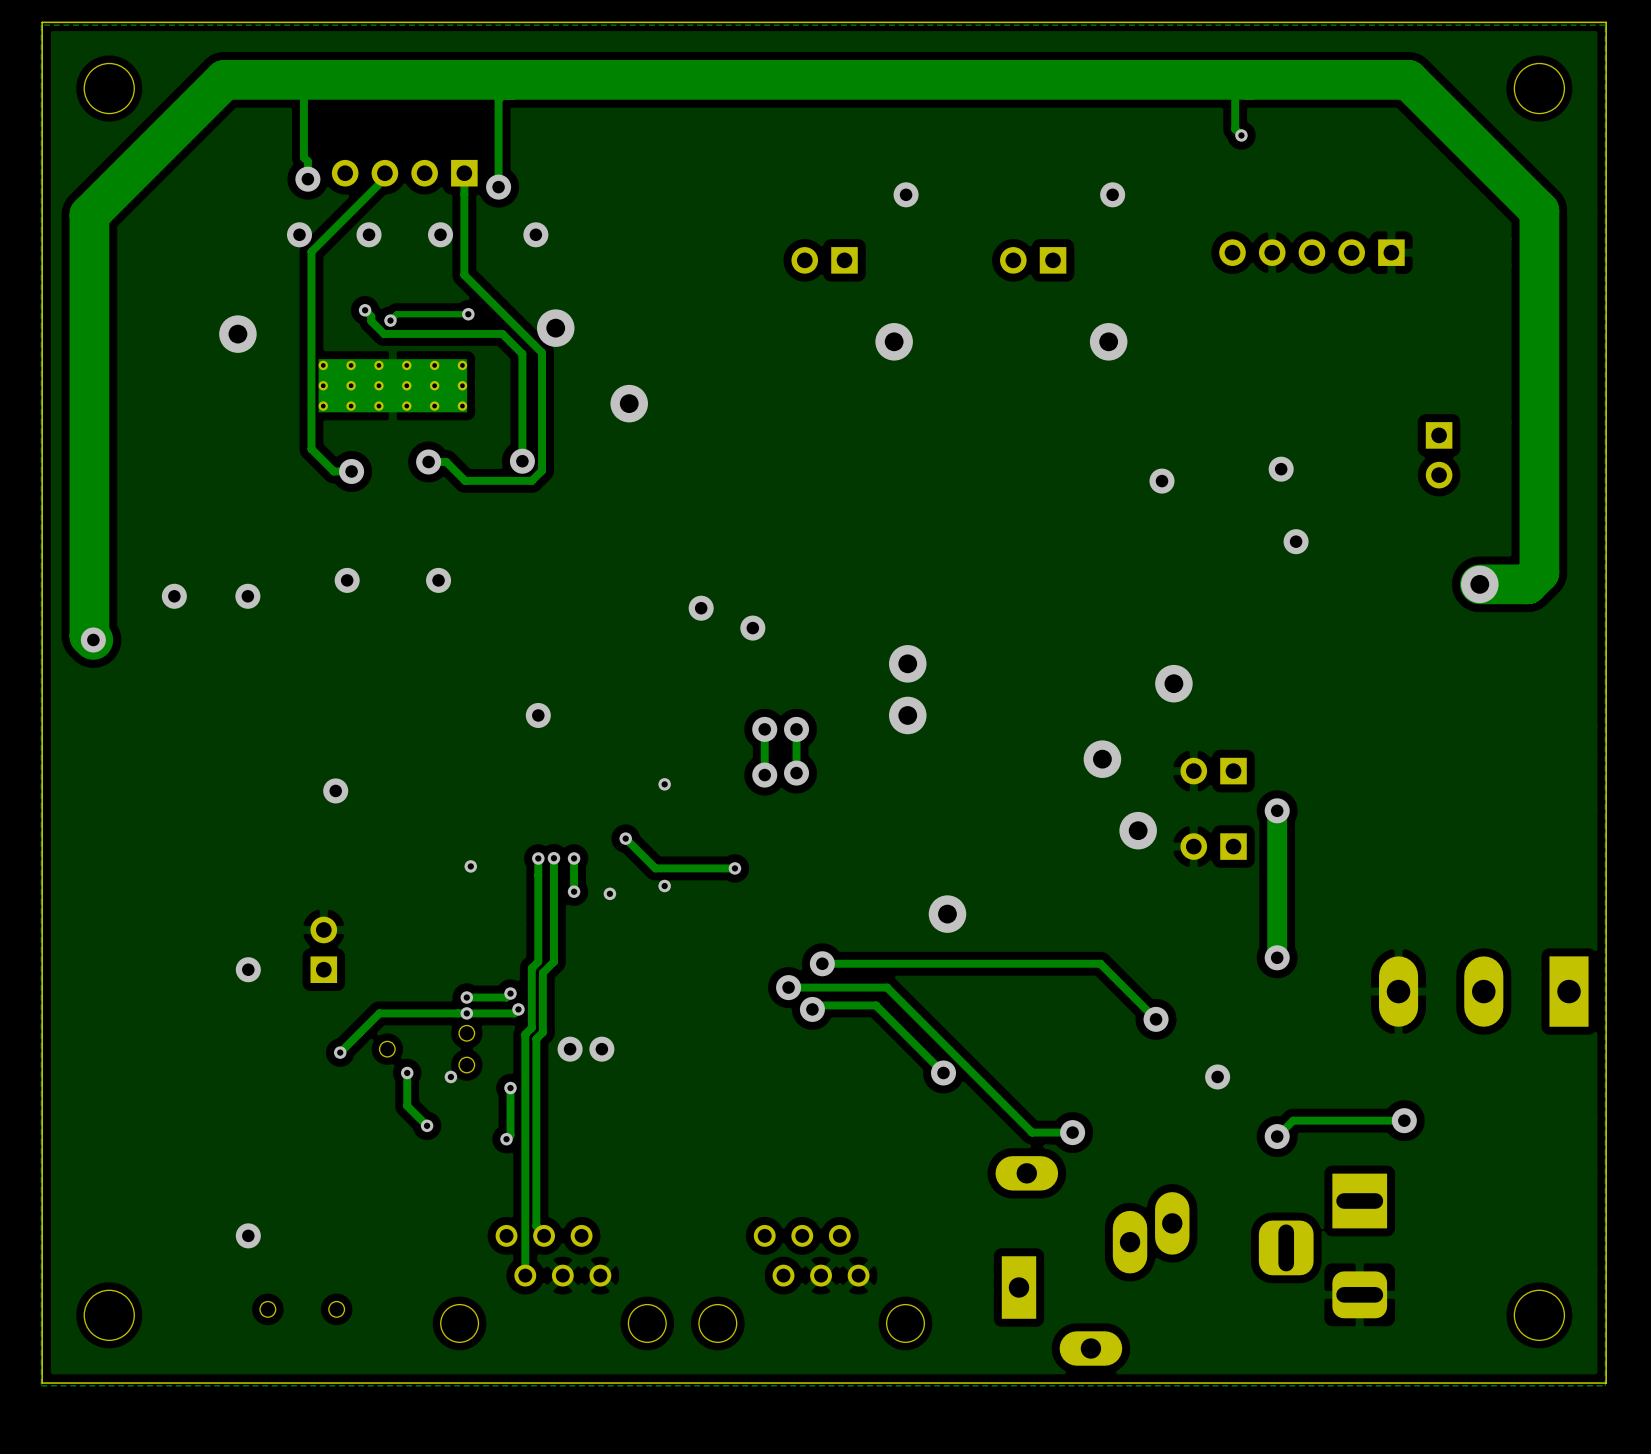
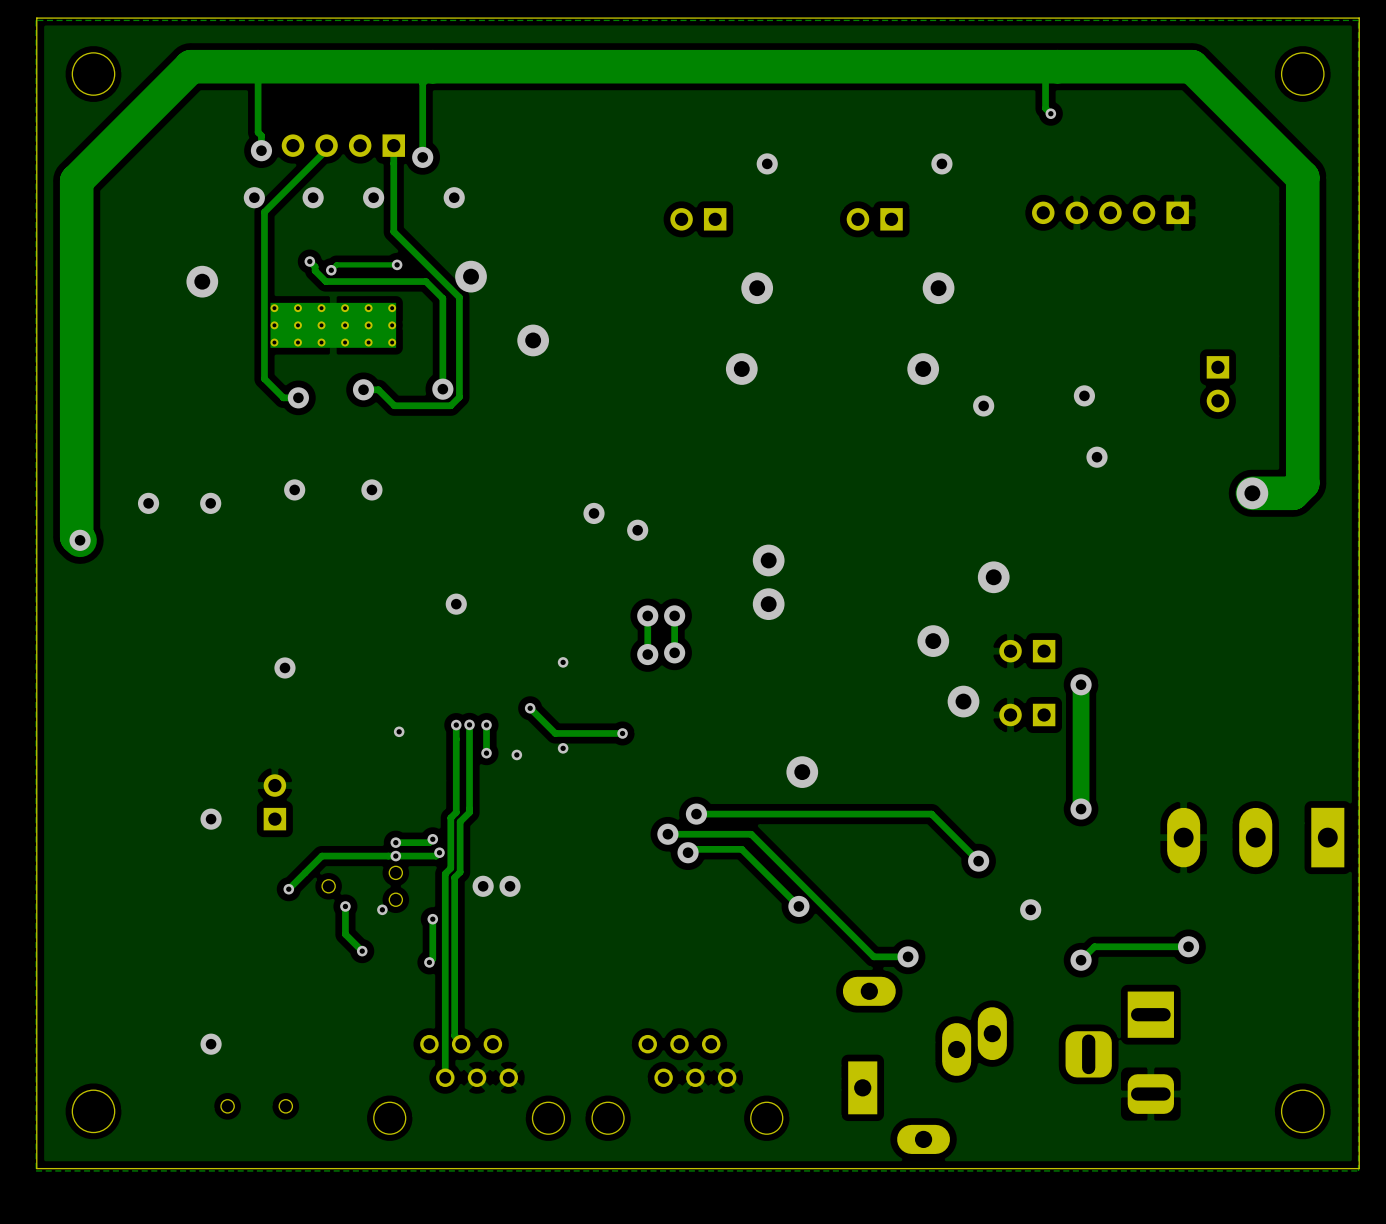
via: none -> (741, 369)
via: none -> (923, 369)

